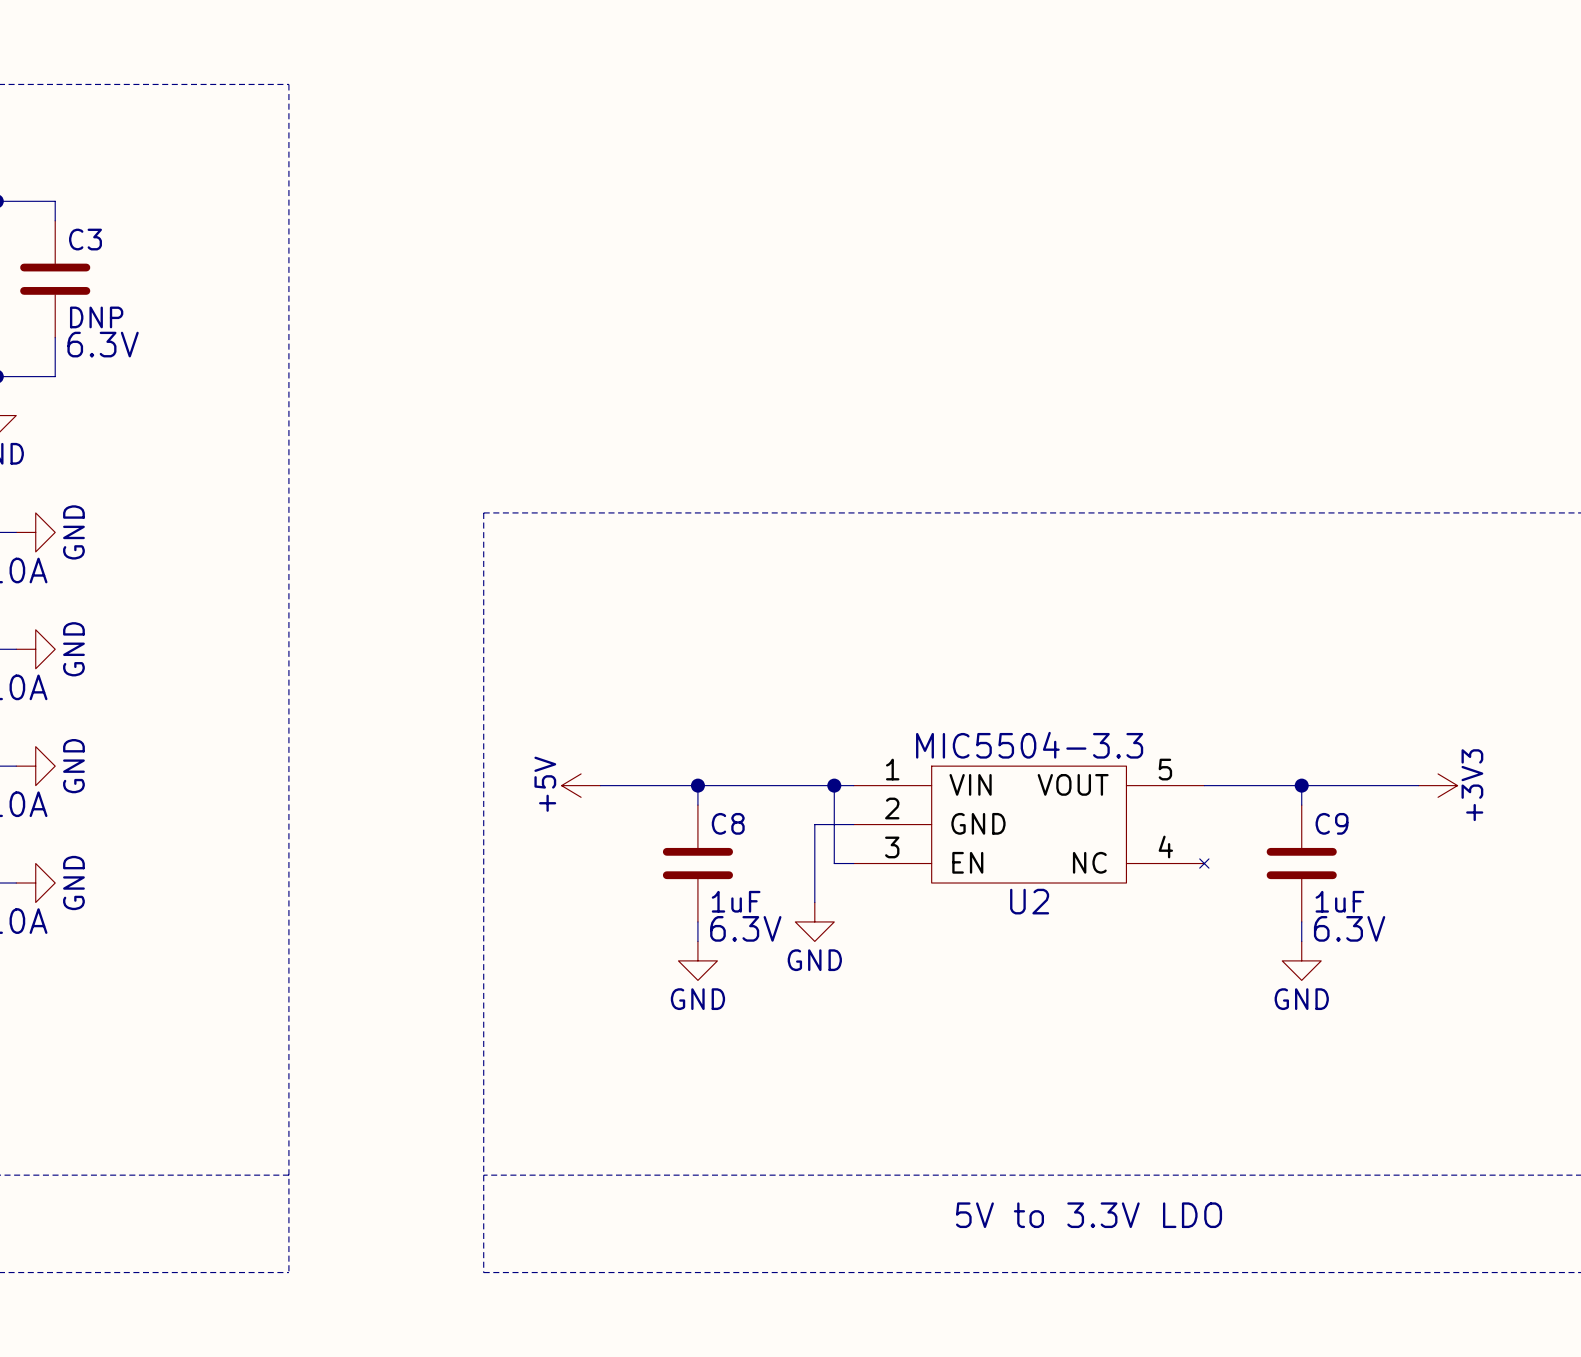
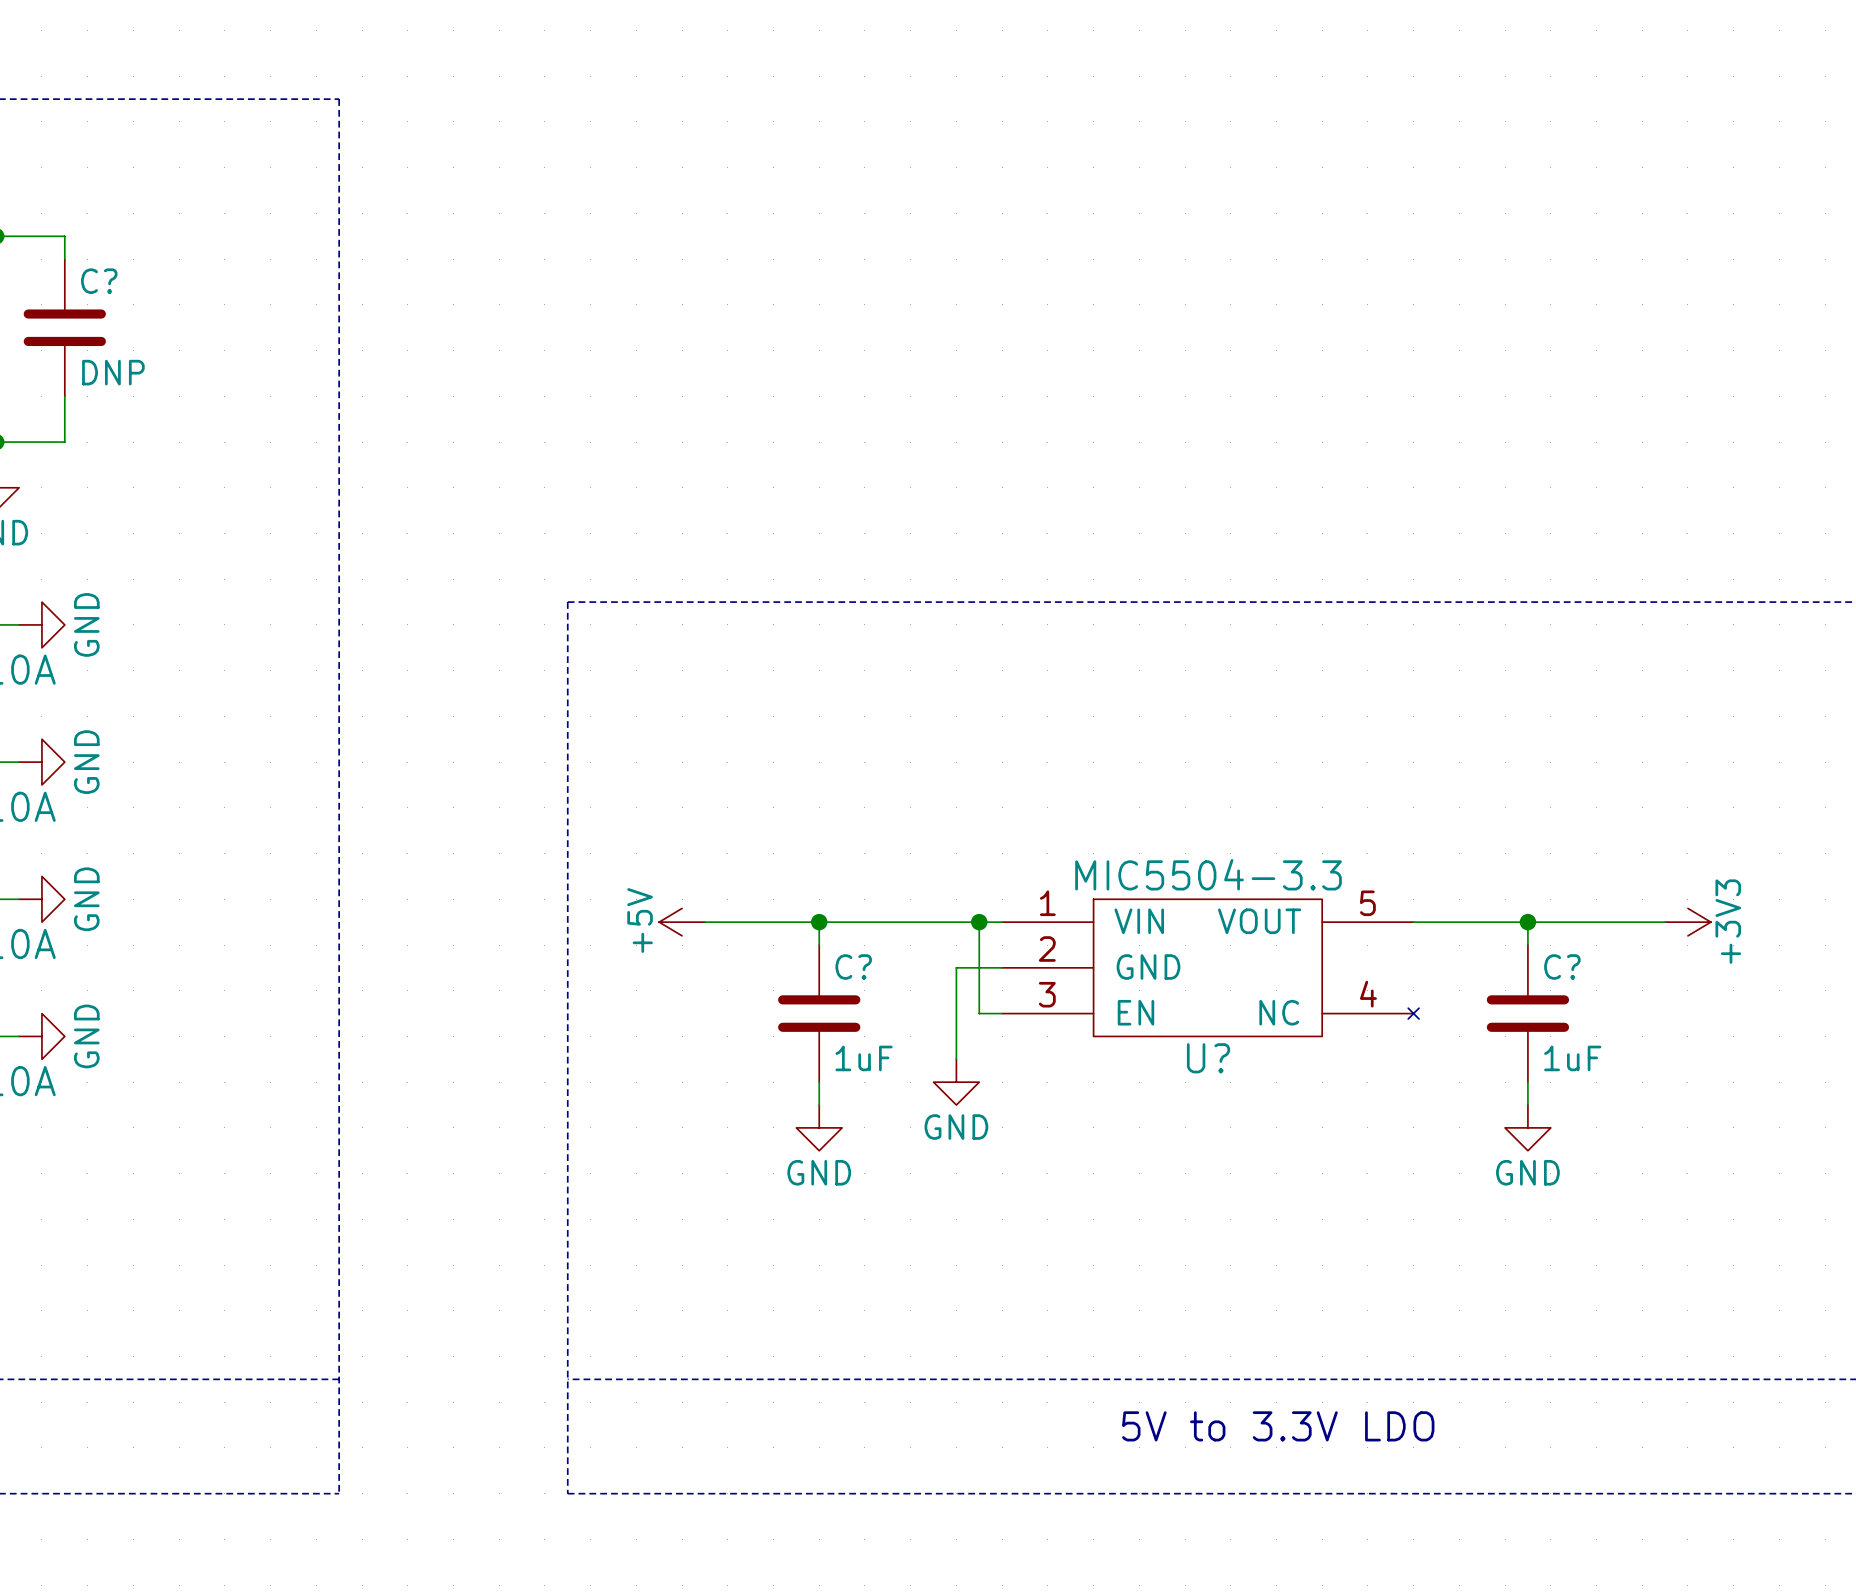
C3 name: C3 (85, 239) -> C? (99, 281)
C3 text: 6.3V (103, 344) -> none
C8 name: C8 (728, 823) -> C? (853, 967)
C9 name: C9 (1332, 823) -> C? (1562, 967)
U2 name: U2 (1029, 901) -> U? (1208, 1058)
C8 text: 6.3V (745, 928) -> none
C9 text: 6.3V (1349, 928) -> none

